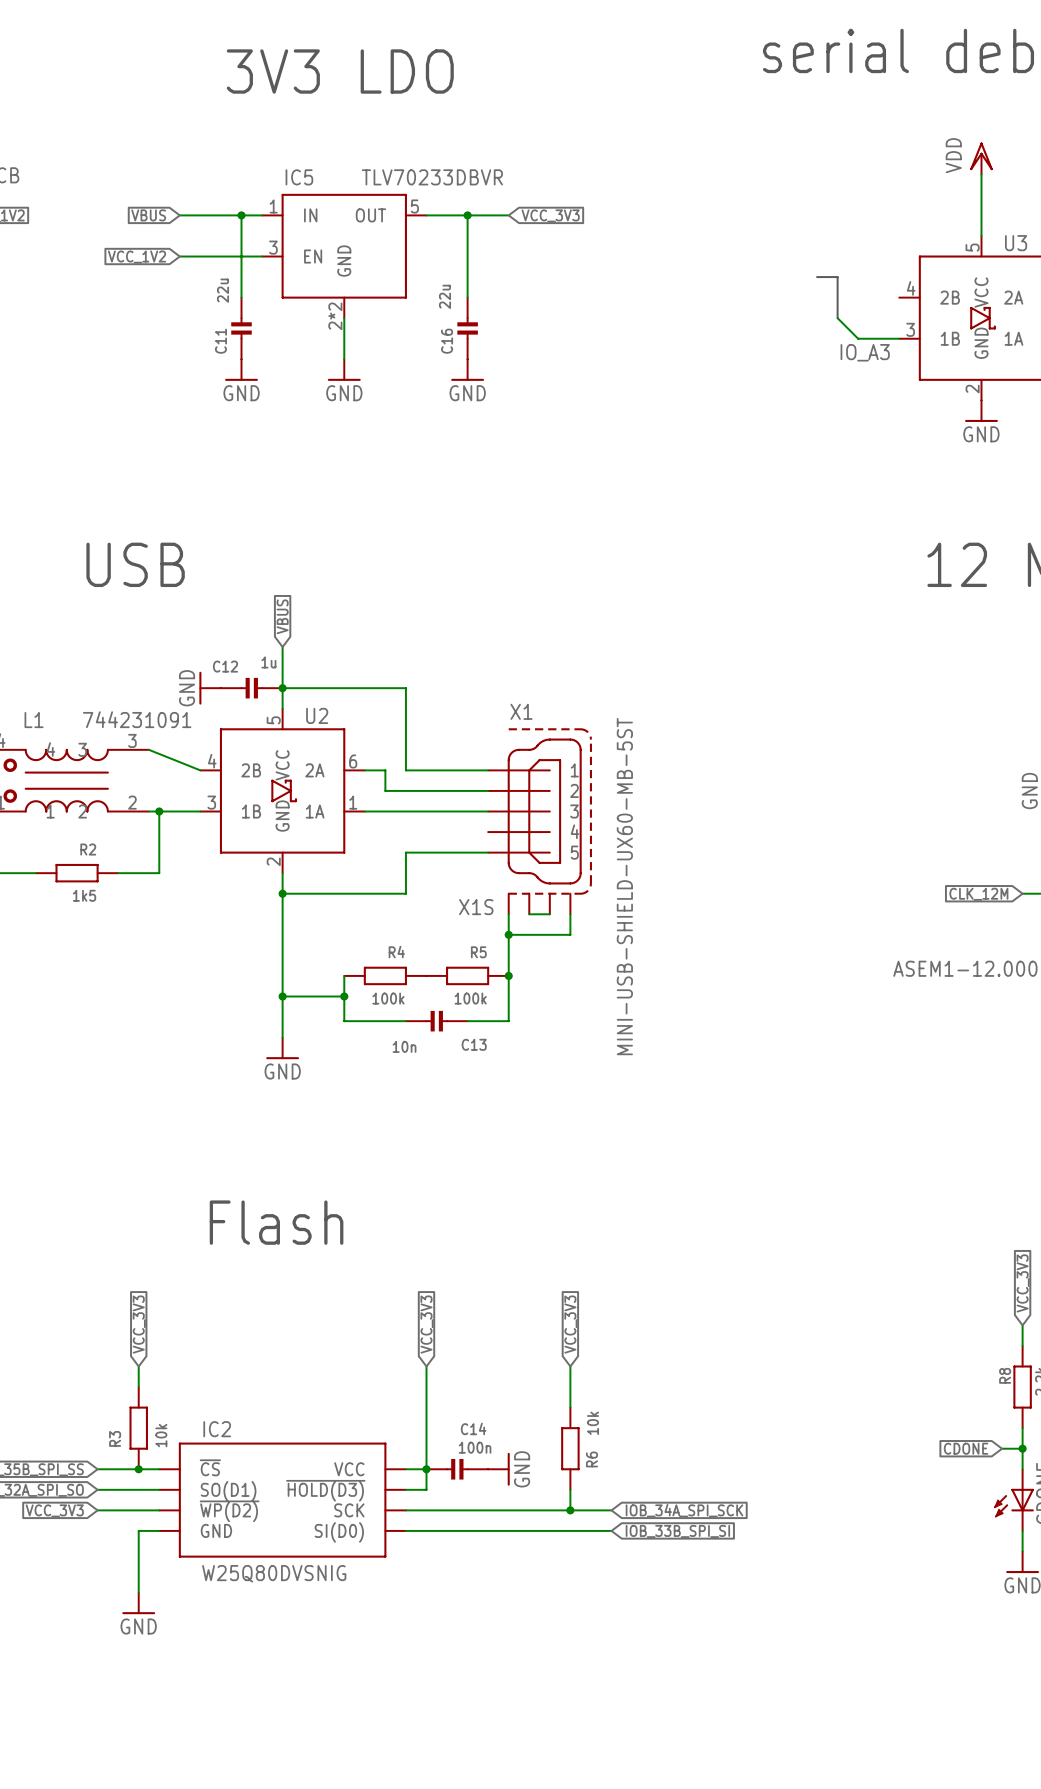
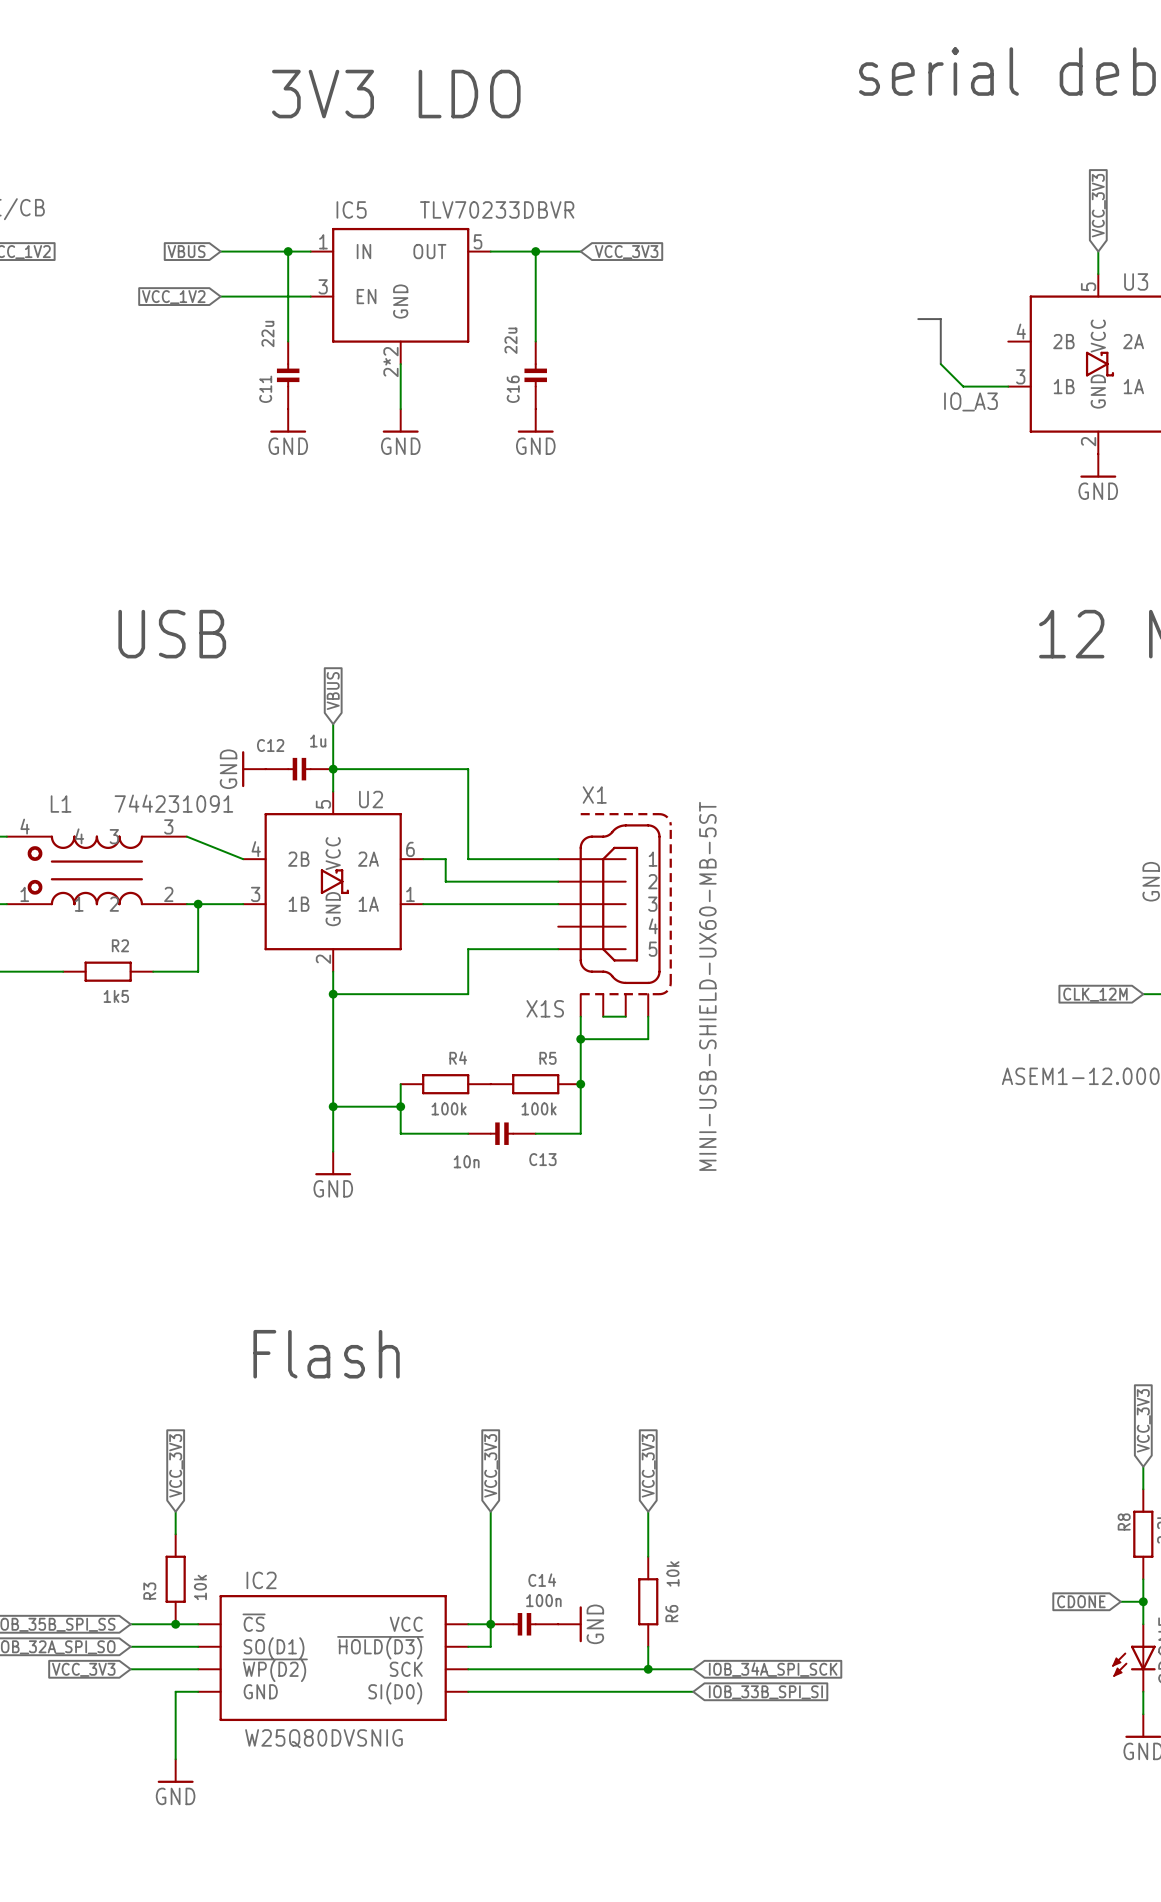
power symbol: VDD (981, 158) -> none
global label: none -> VCC_3V3 (1098, 205)
wire: (981, 174) (981, 215) -> none

